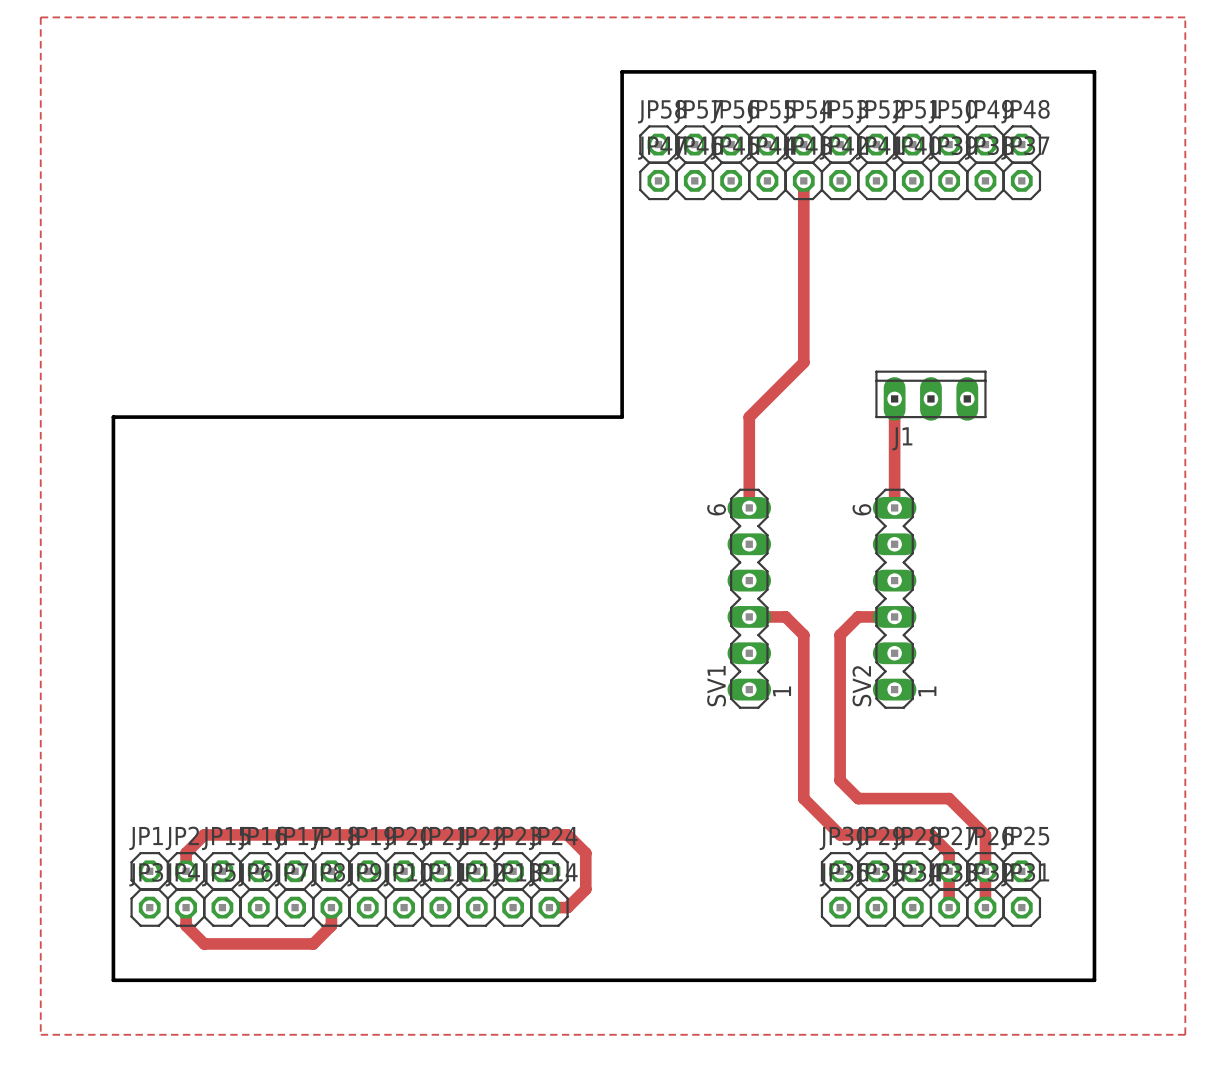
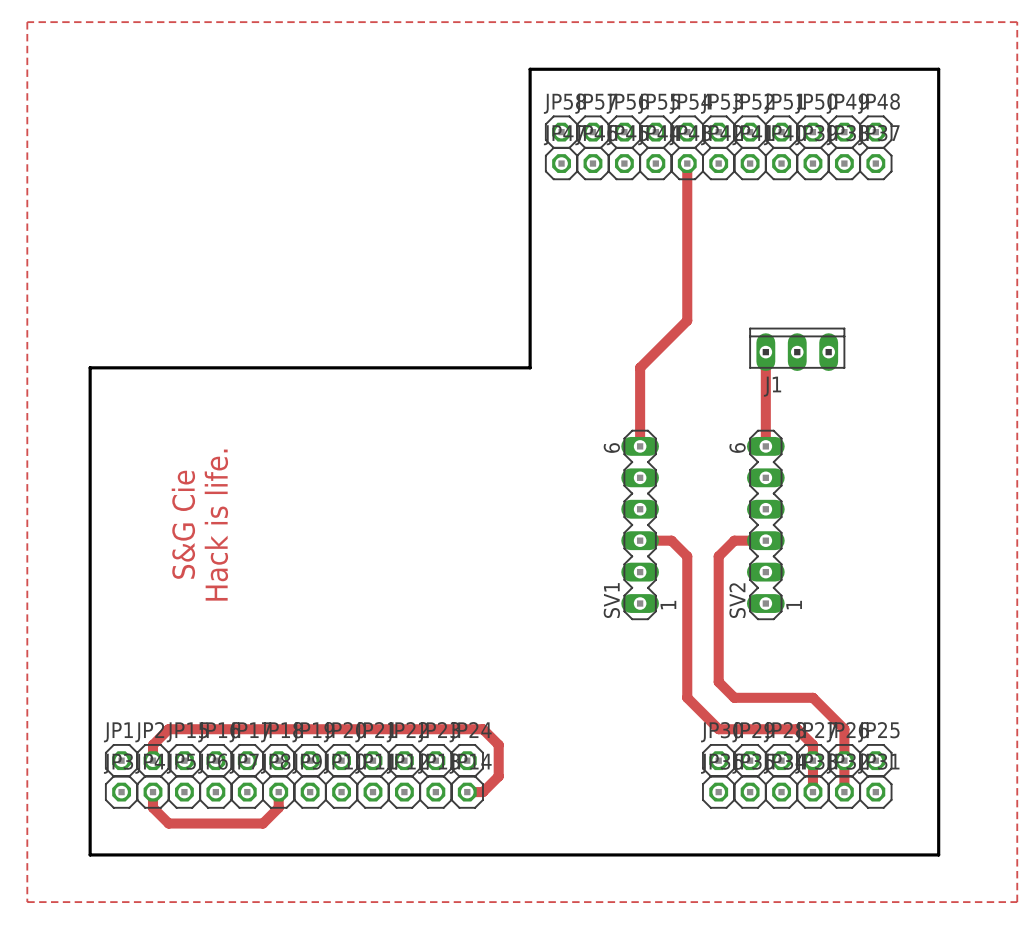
text: none -> S&G Cie (183, 524)
text: none -> Hack is life. (216, 525)

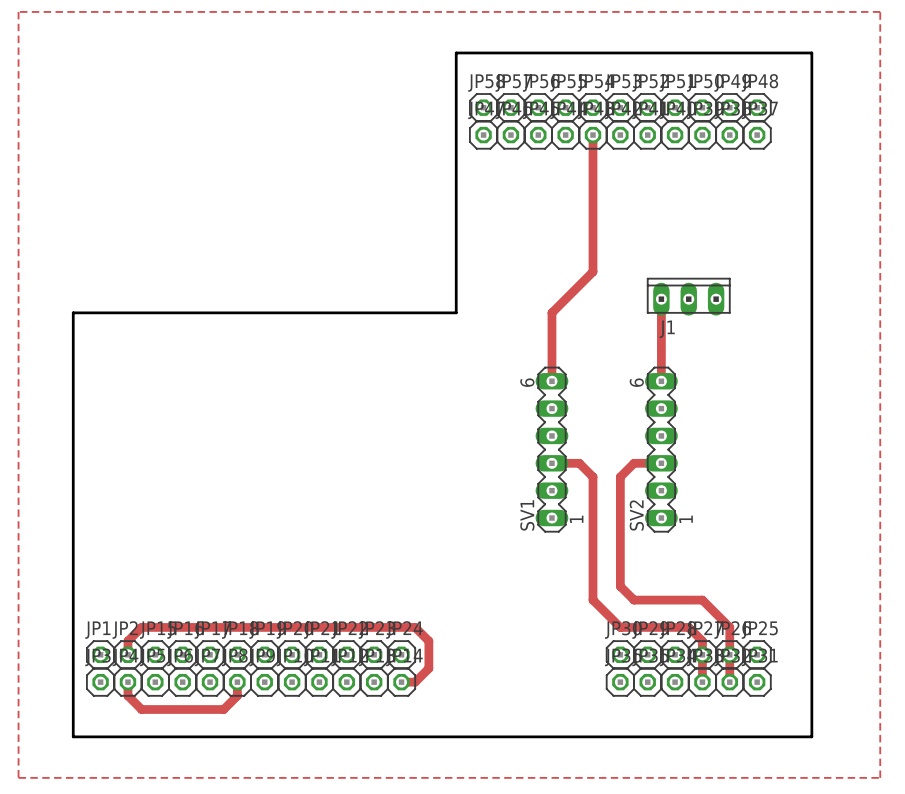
text: S&G Cie (183, 524) -> none
text: Hack is life. (216, 525) -> none

